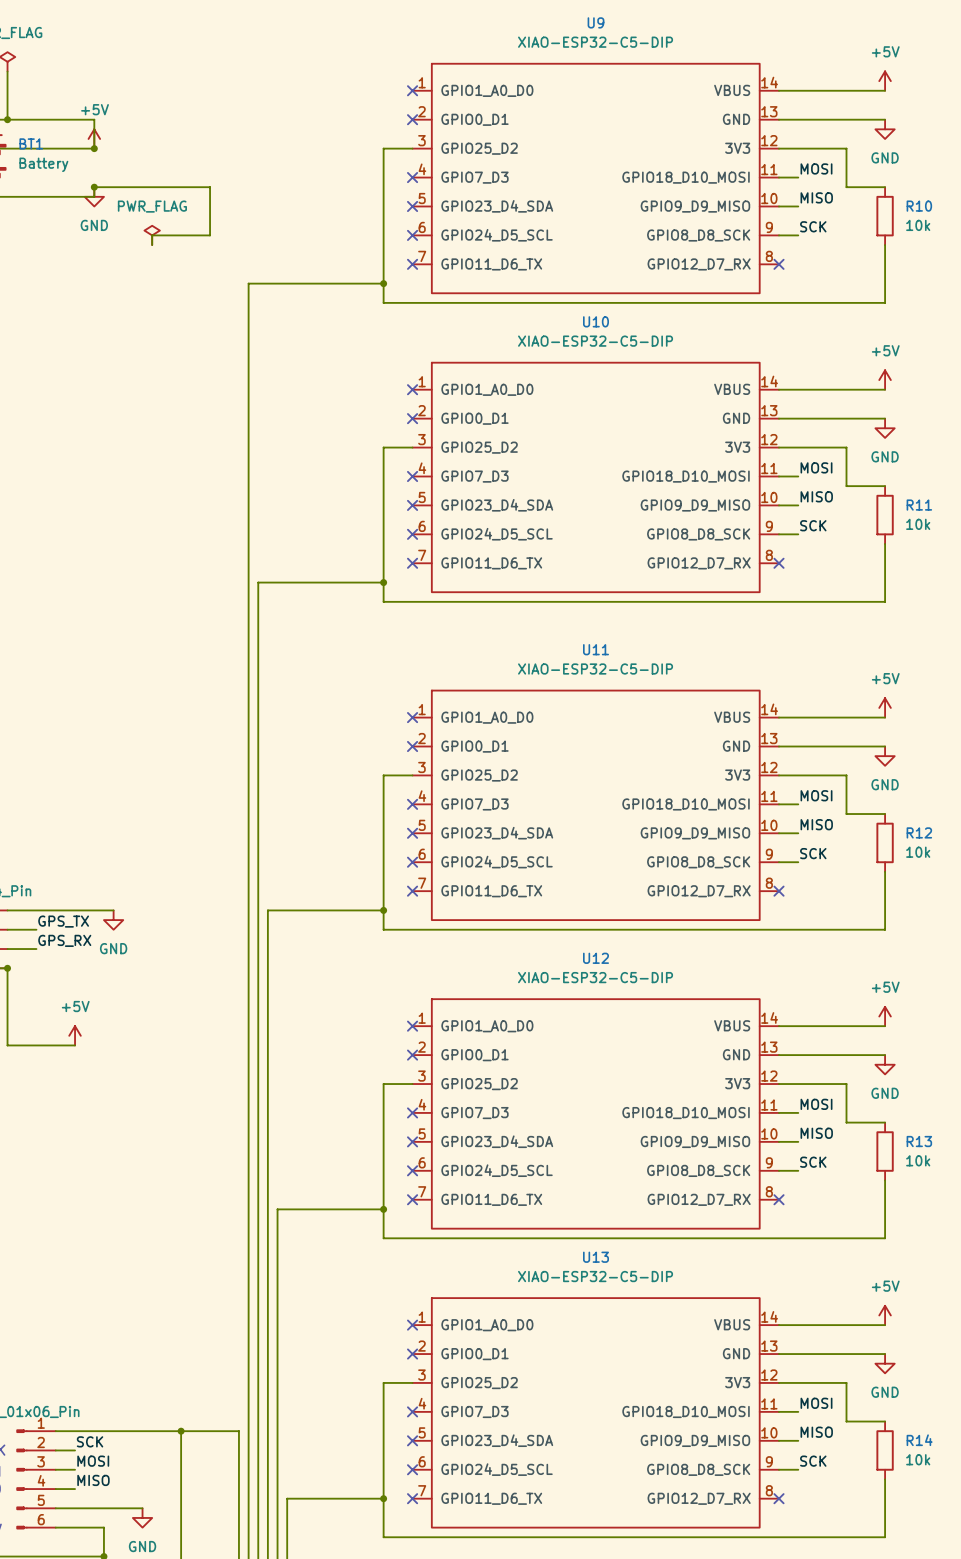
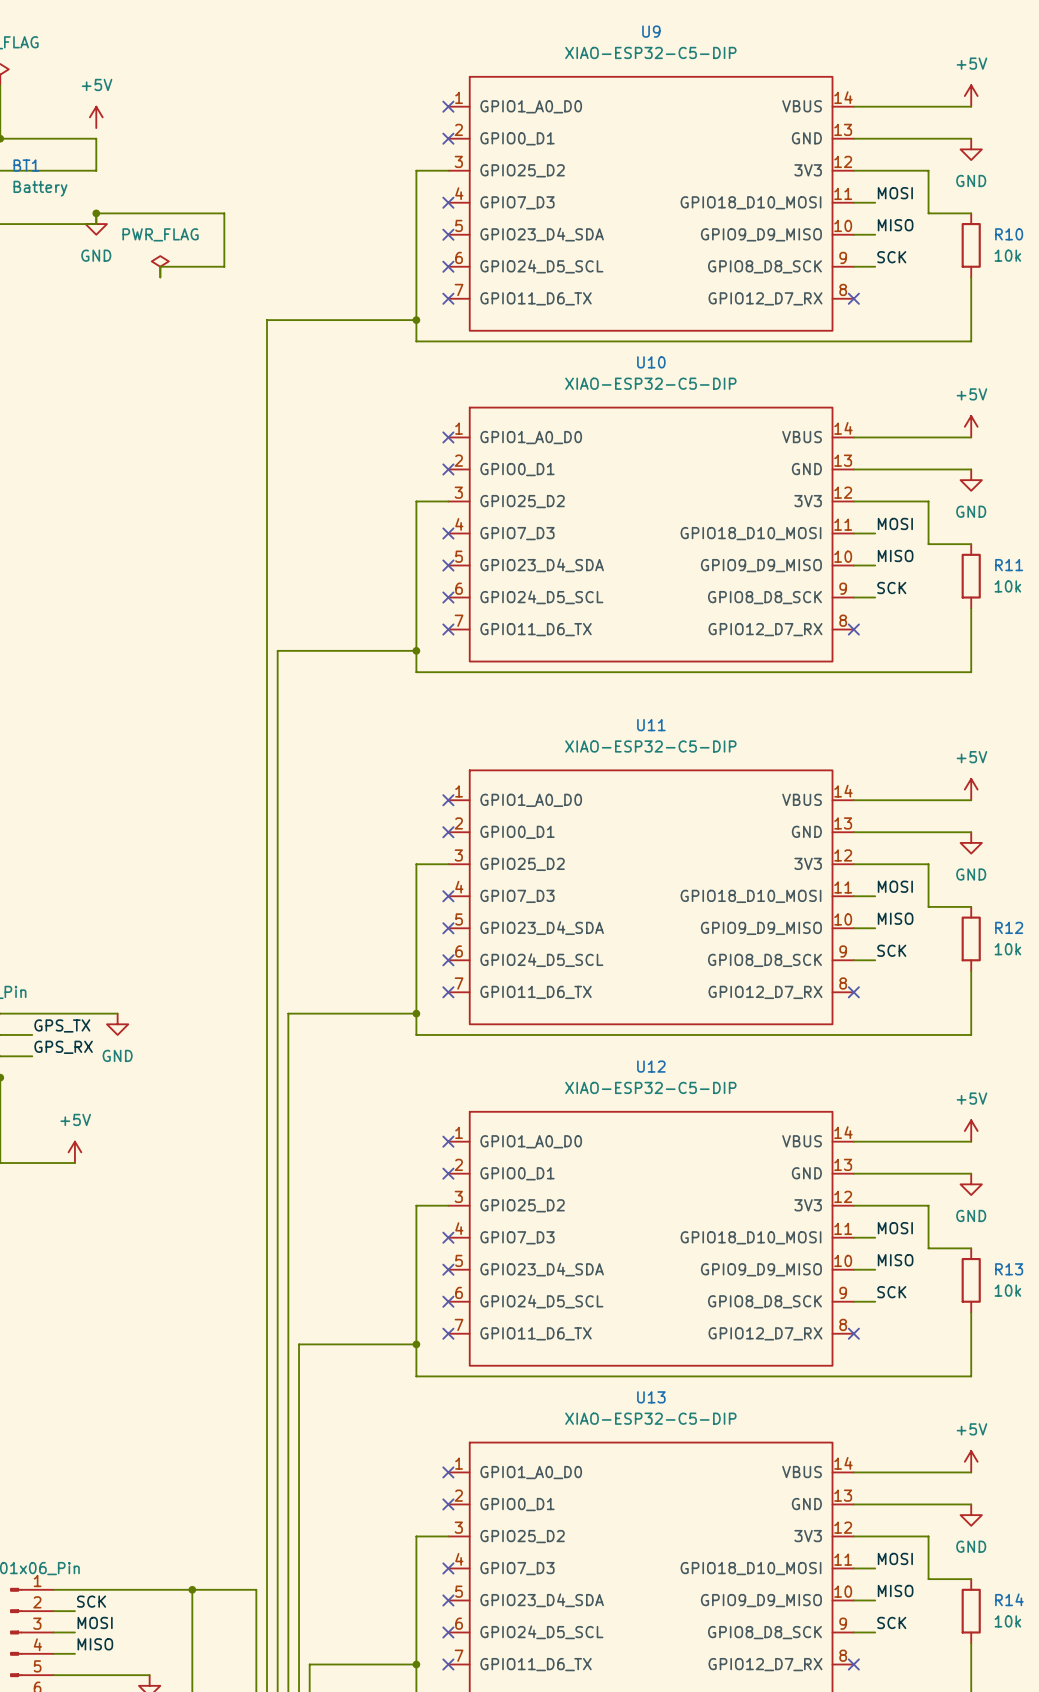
power symbol position: +5V (94, 138) -> +5V (96, 117)
junction: (94, 148) -> none

